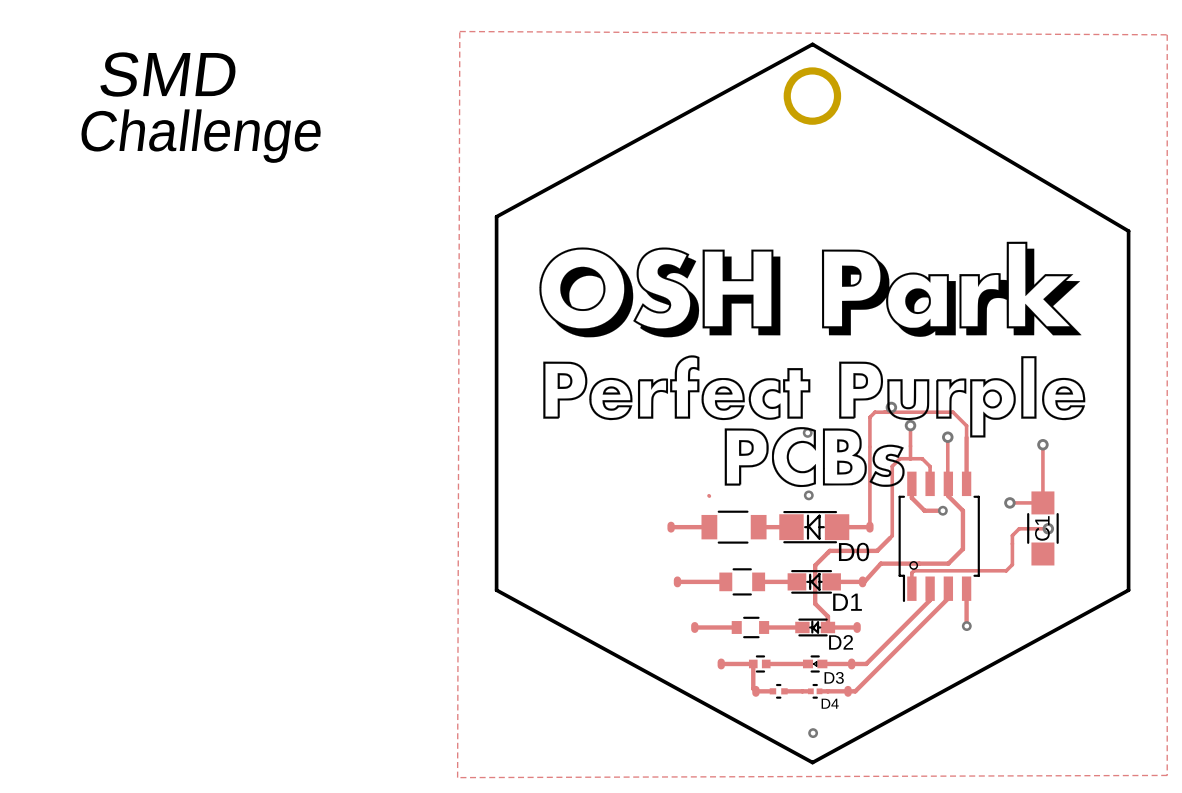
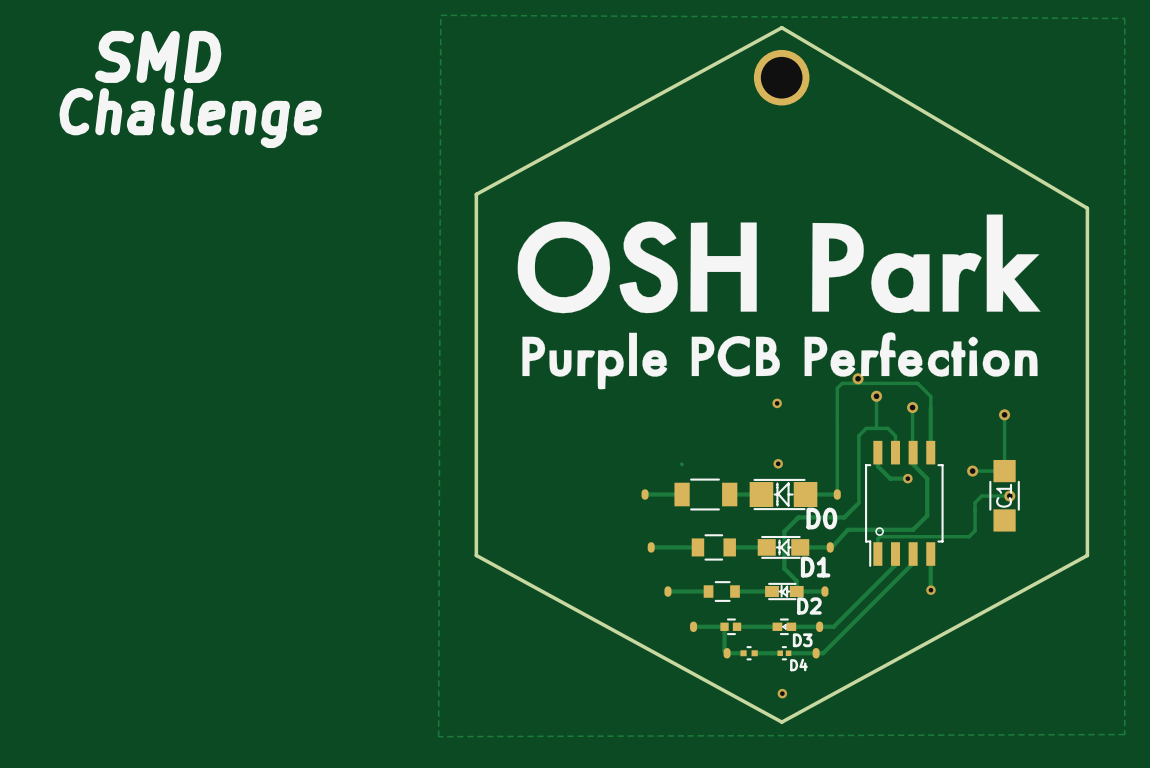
drawing shape: [539, 241, 1082, 338] -> [517, 214, 1041, 314]
drawing: [543, 355, 1086, 488] -> none
drawing: none -> [522, 332, 1038, 390]

